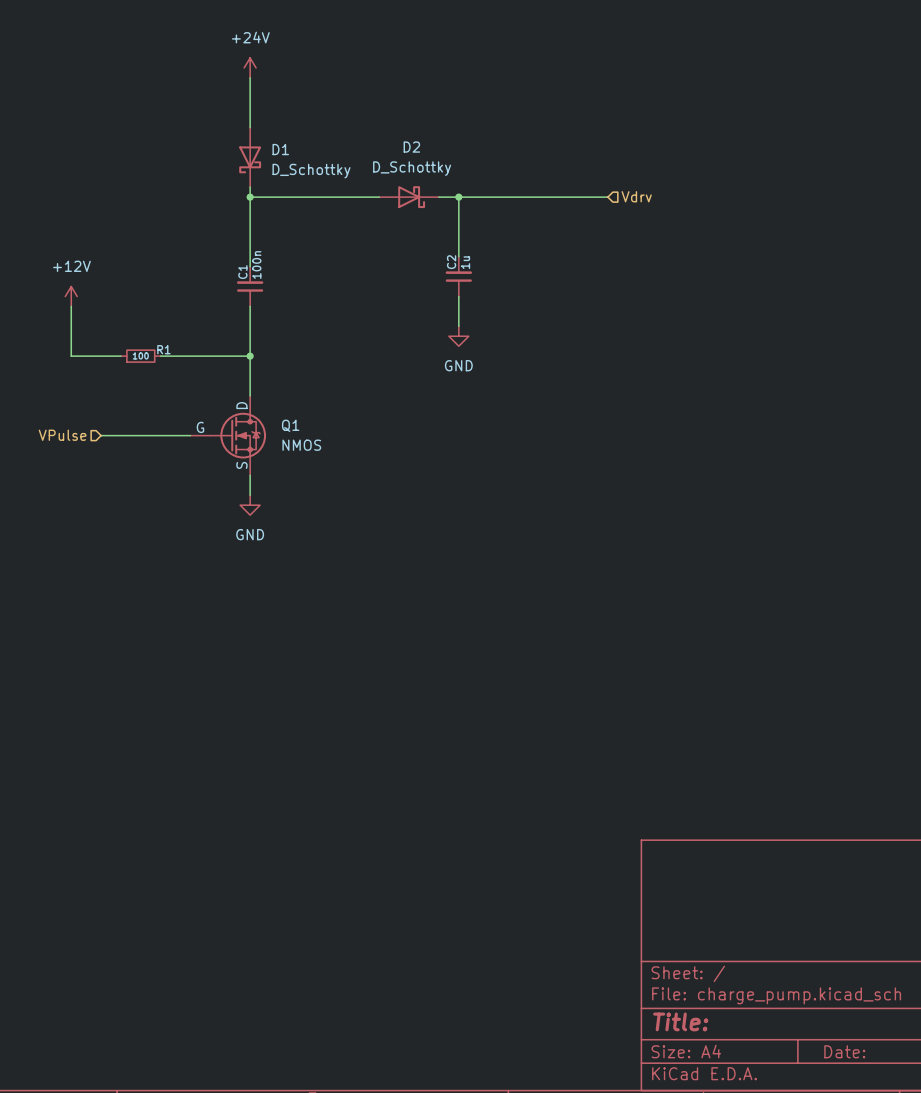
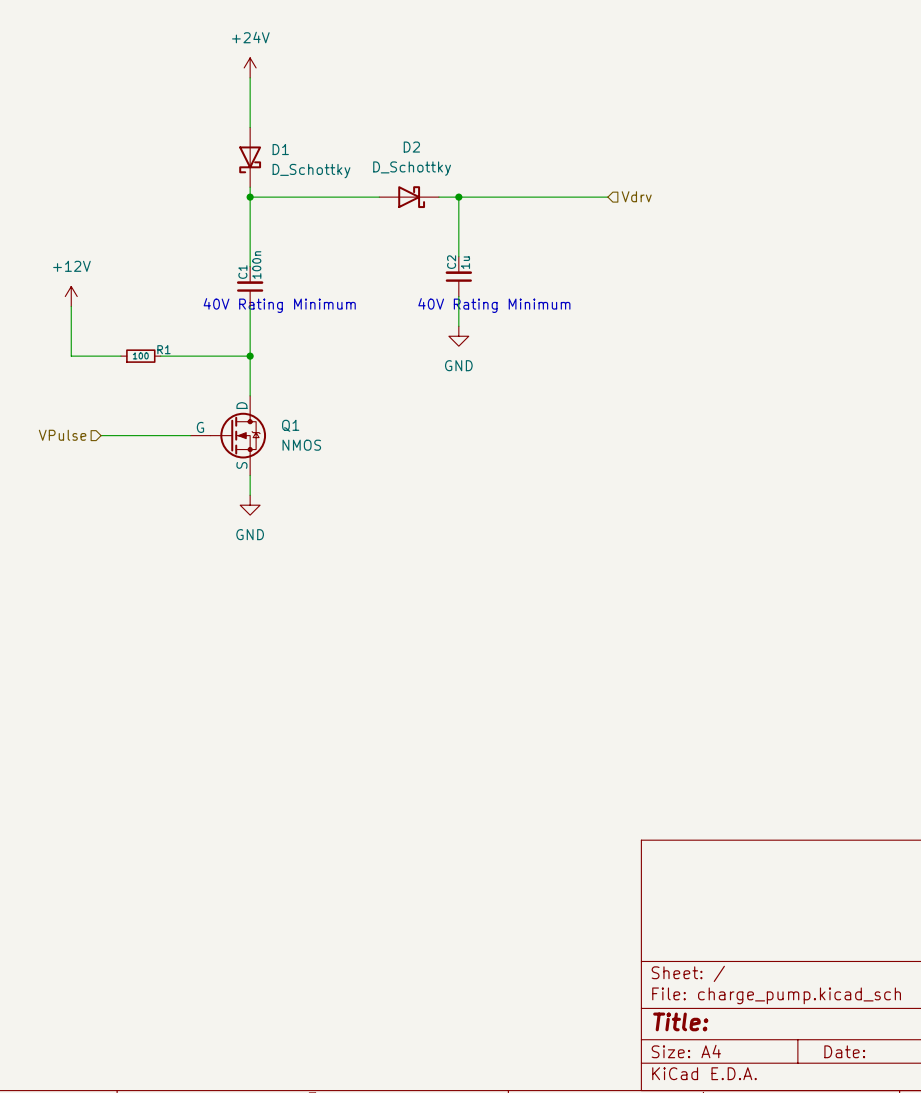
text: none -> 40V Rating Minimum (279, 305)
text: none -> 40V Rating Minimum (494, 305)

